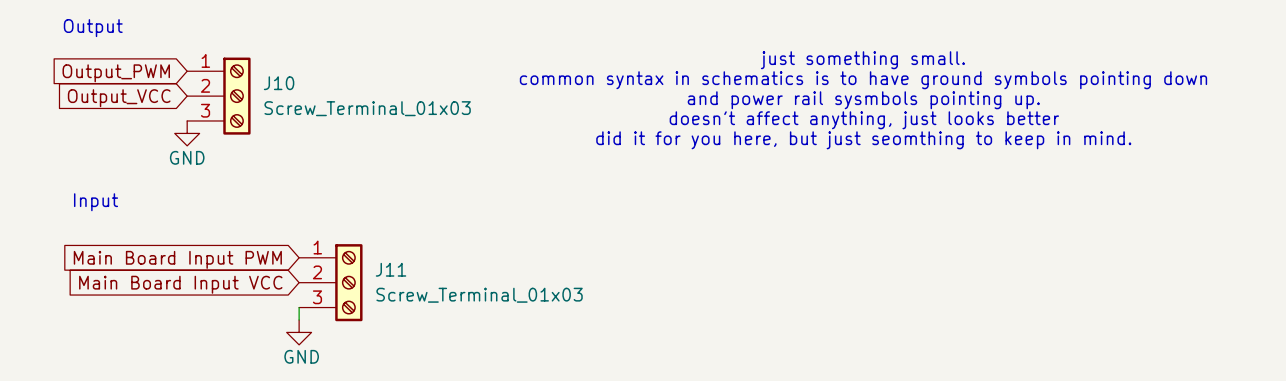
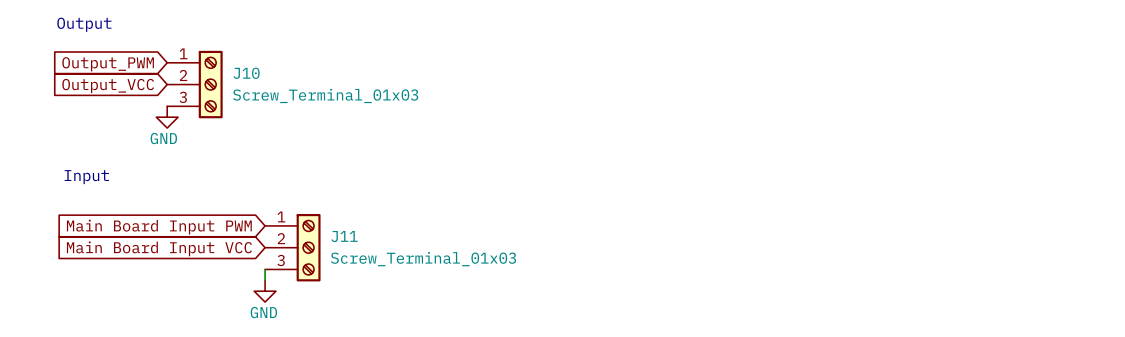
text: just something small. (862, 60) -> none
text: common syntax in schematics is to have ground symbols pointing down (863, 80) -> none
text: and power rail sysmbols pointing up. (863, 100) -> none
text: doesn't affect anything, just looks better (864, 120) -> none
text: did it for you here, but just seomthing to keep in mind. (863, 140) -> none

